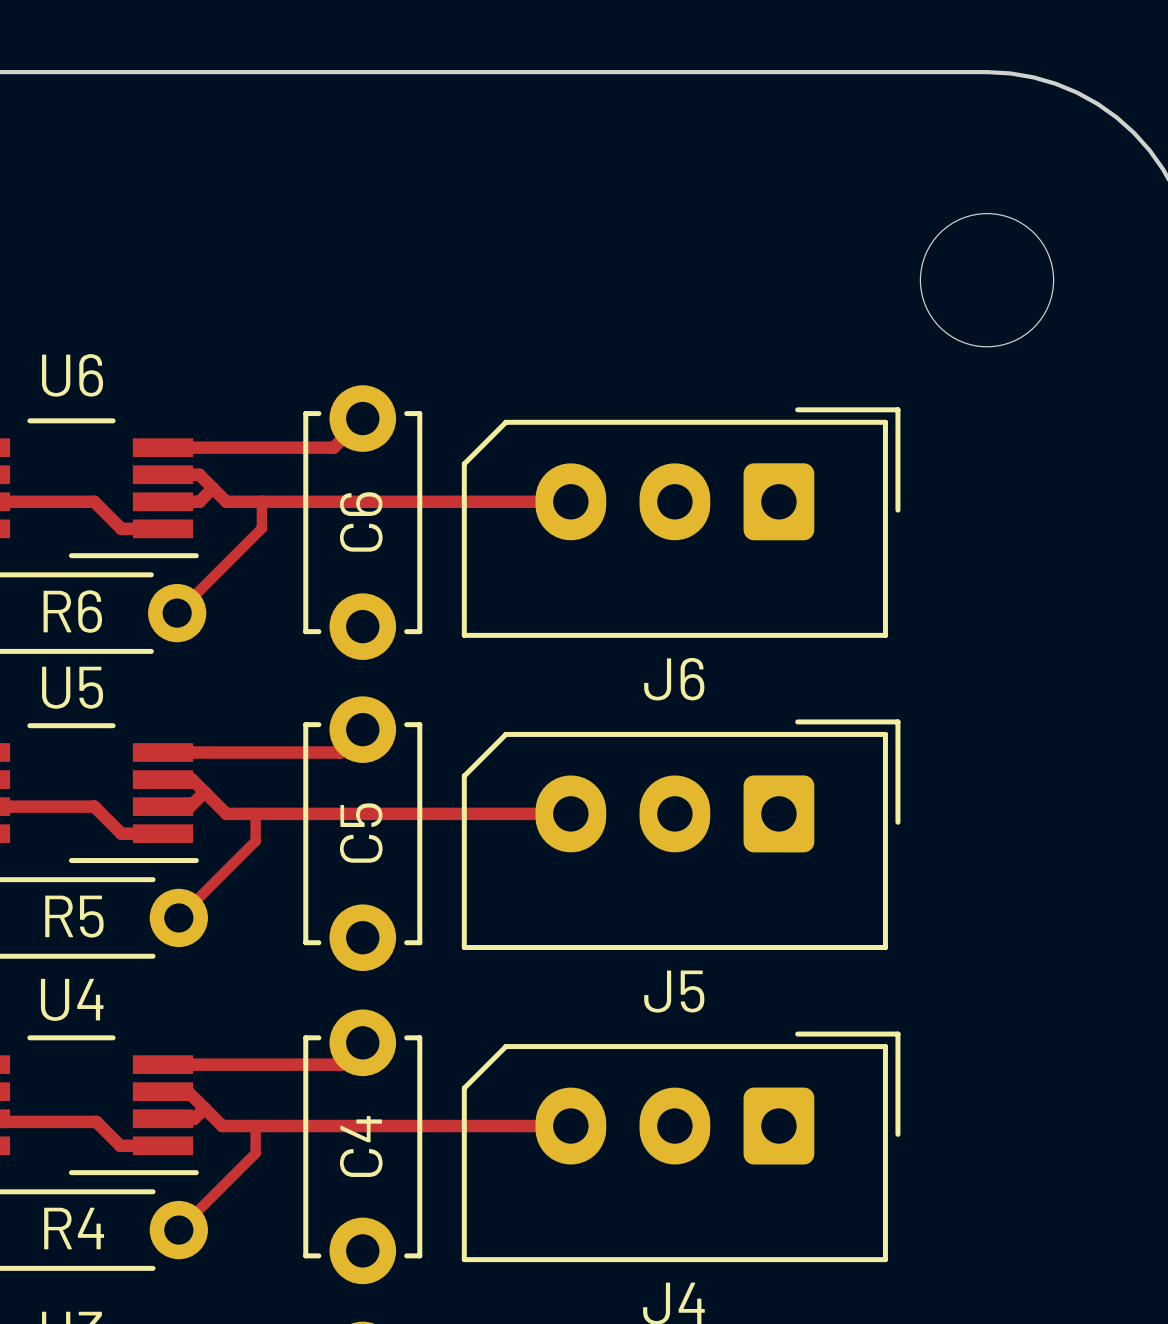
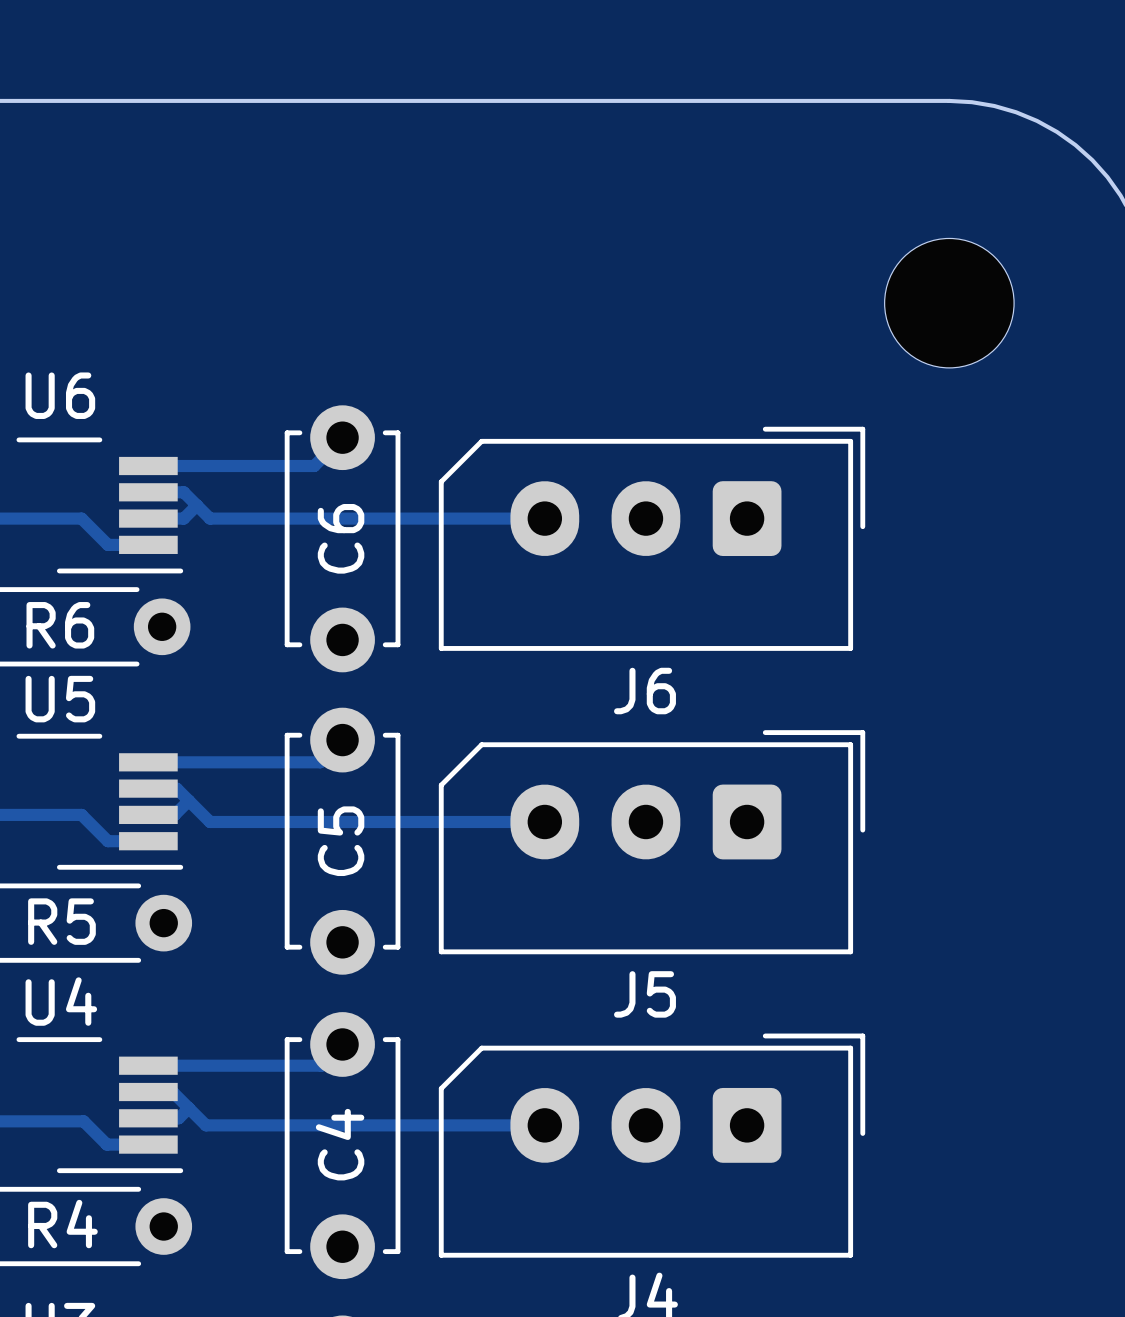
track: (261, 501) (261, 528) (177, 613) -> none
track: (255, 813) (255, 841) (178, 917) -> none
track: (255, 1126) (255, 1153) (178, 1230) -> none

